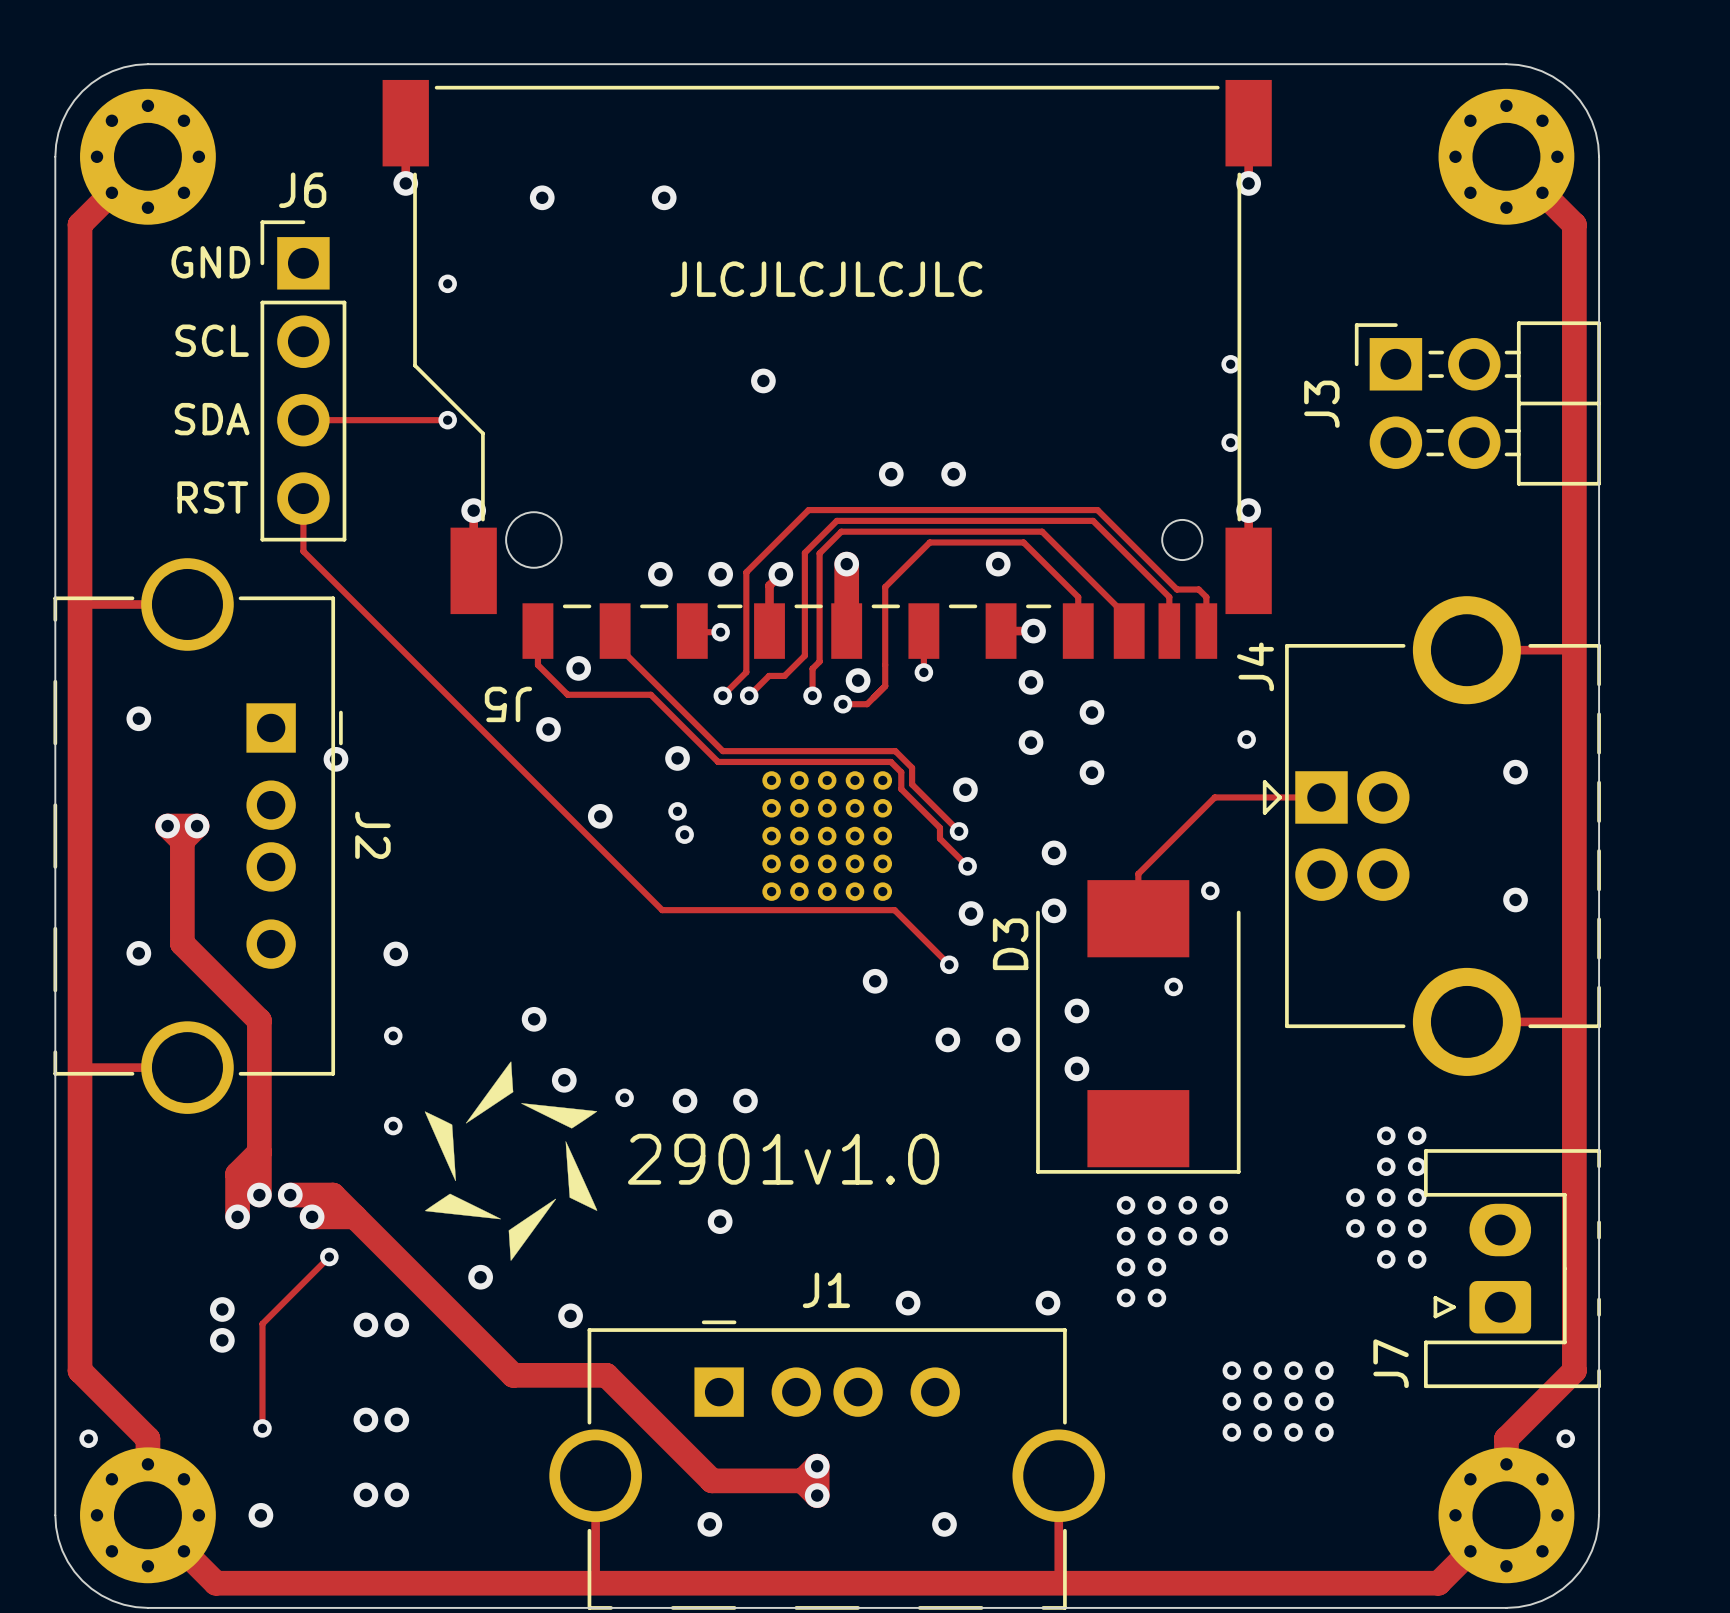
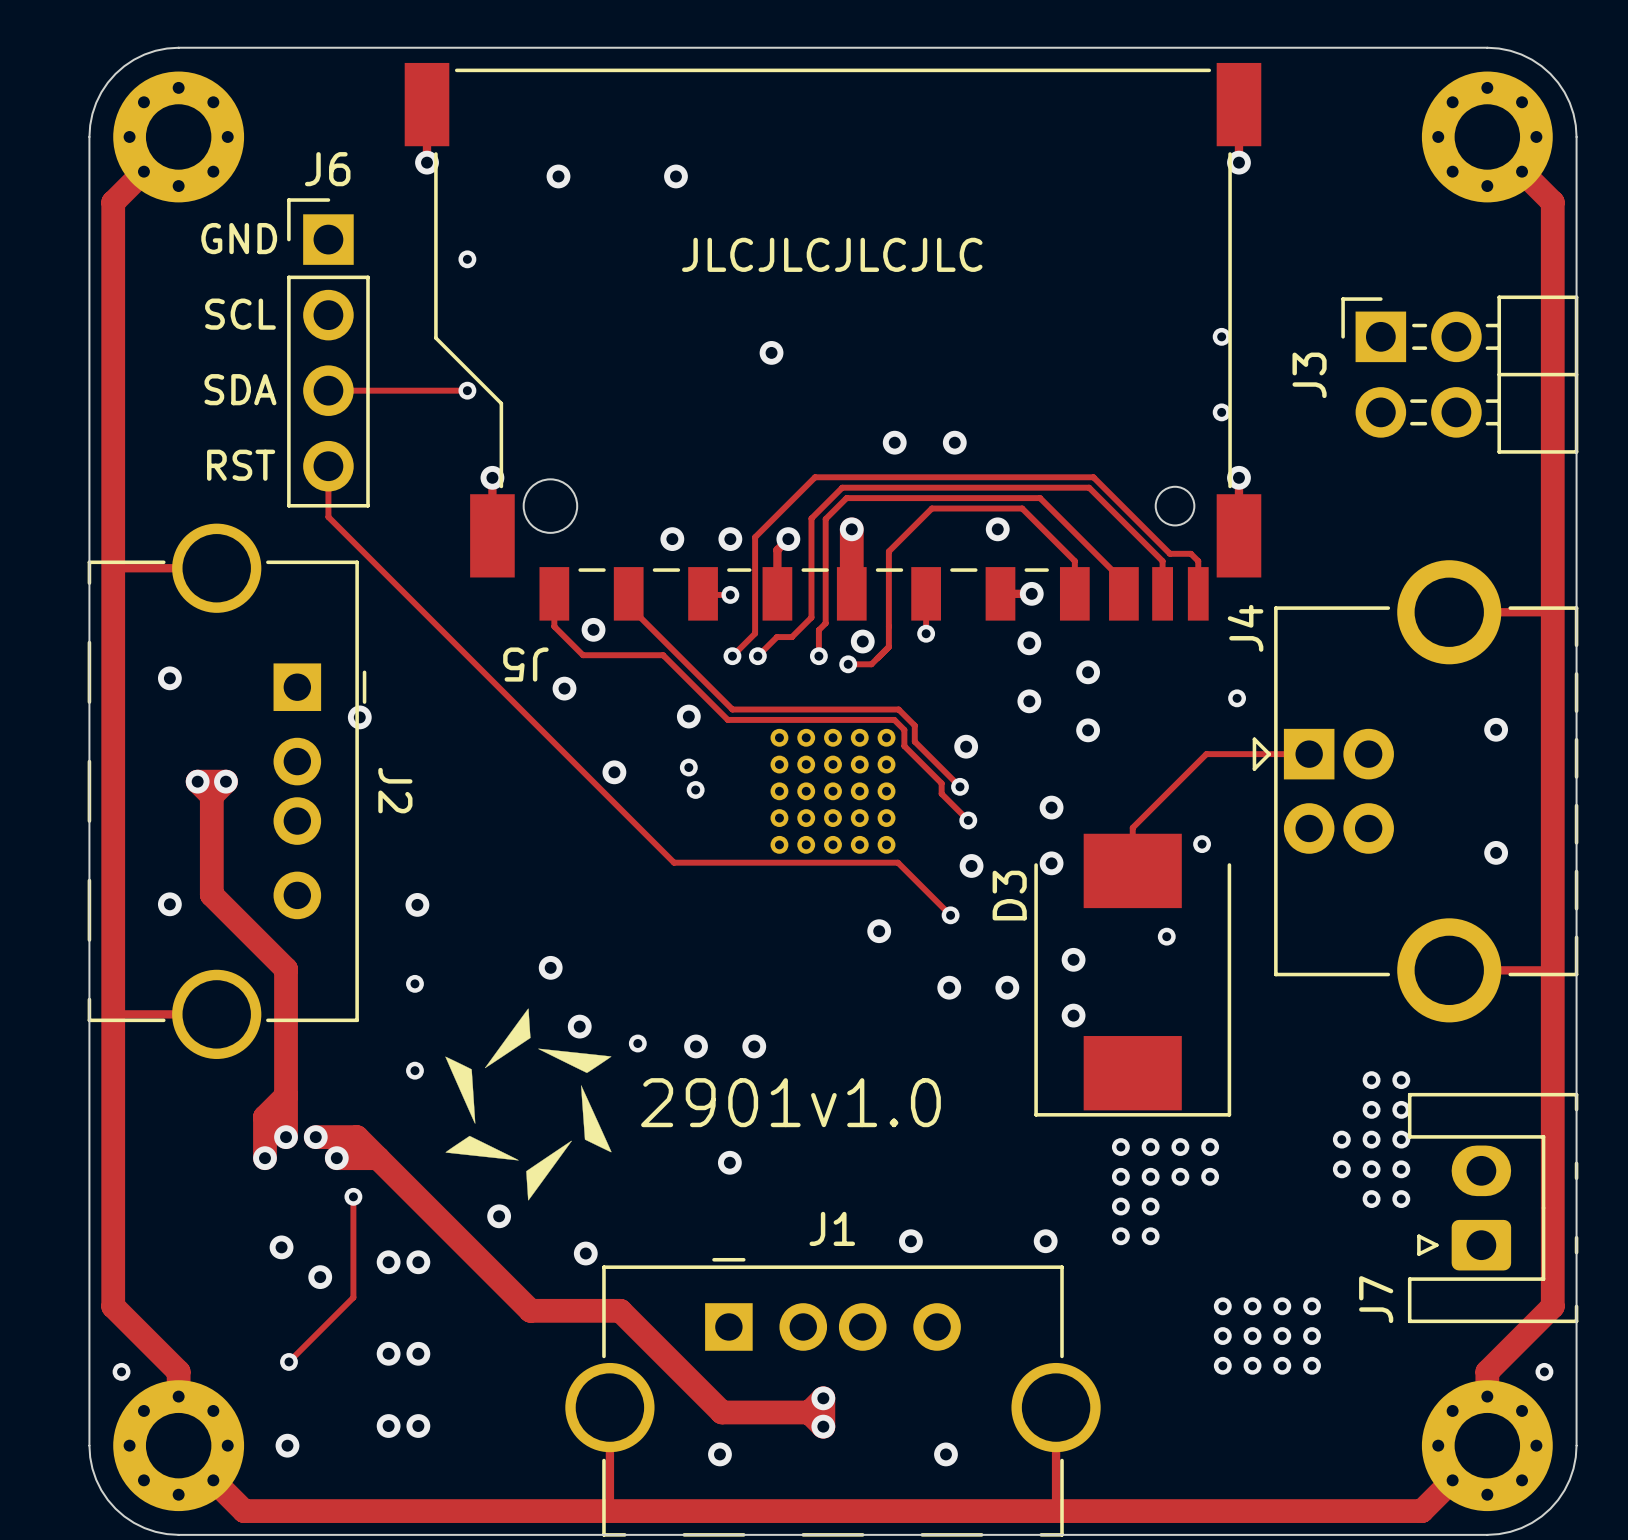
track: (329, 1257) (262, 1323) (262, 1428) -> (353, 1196) (353, 1297) (288, 1361)
via: (222, 1309) -> none
via: none -> (281, 1247)
via: (222, 1340) -> none
via: none -> (320, 1277)

